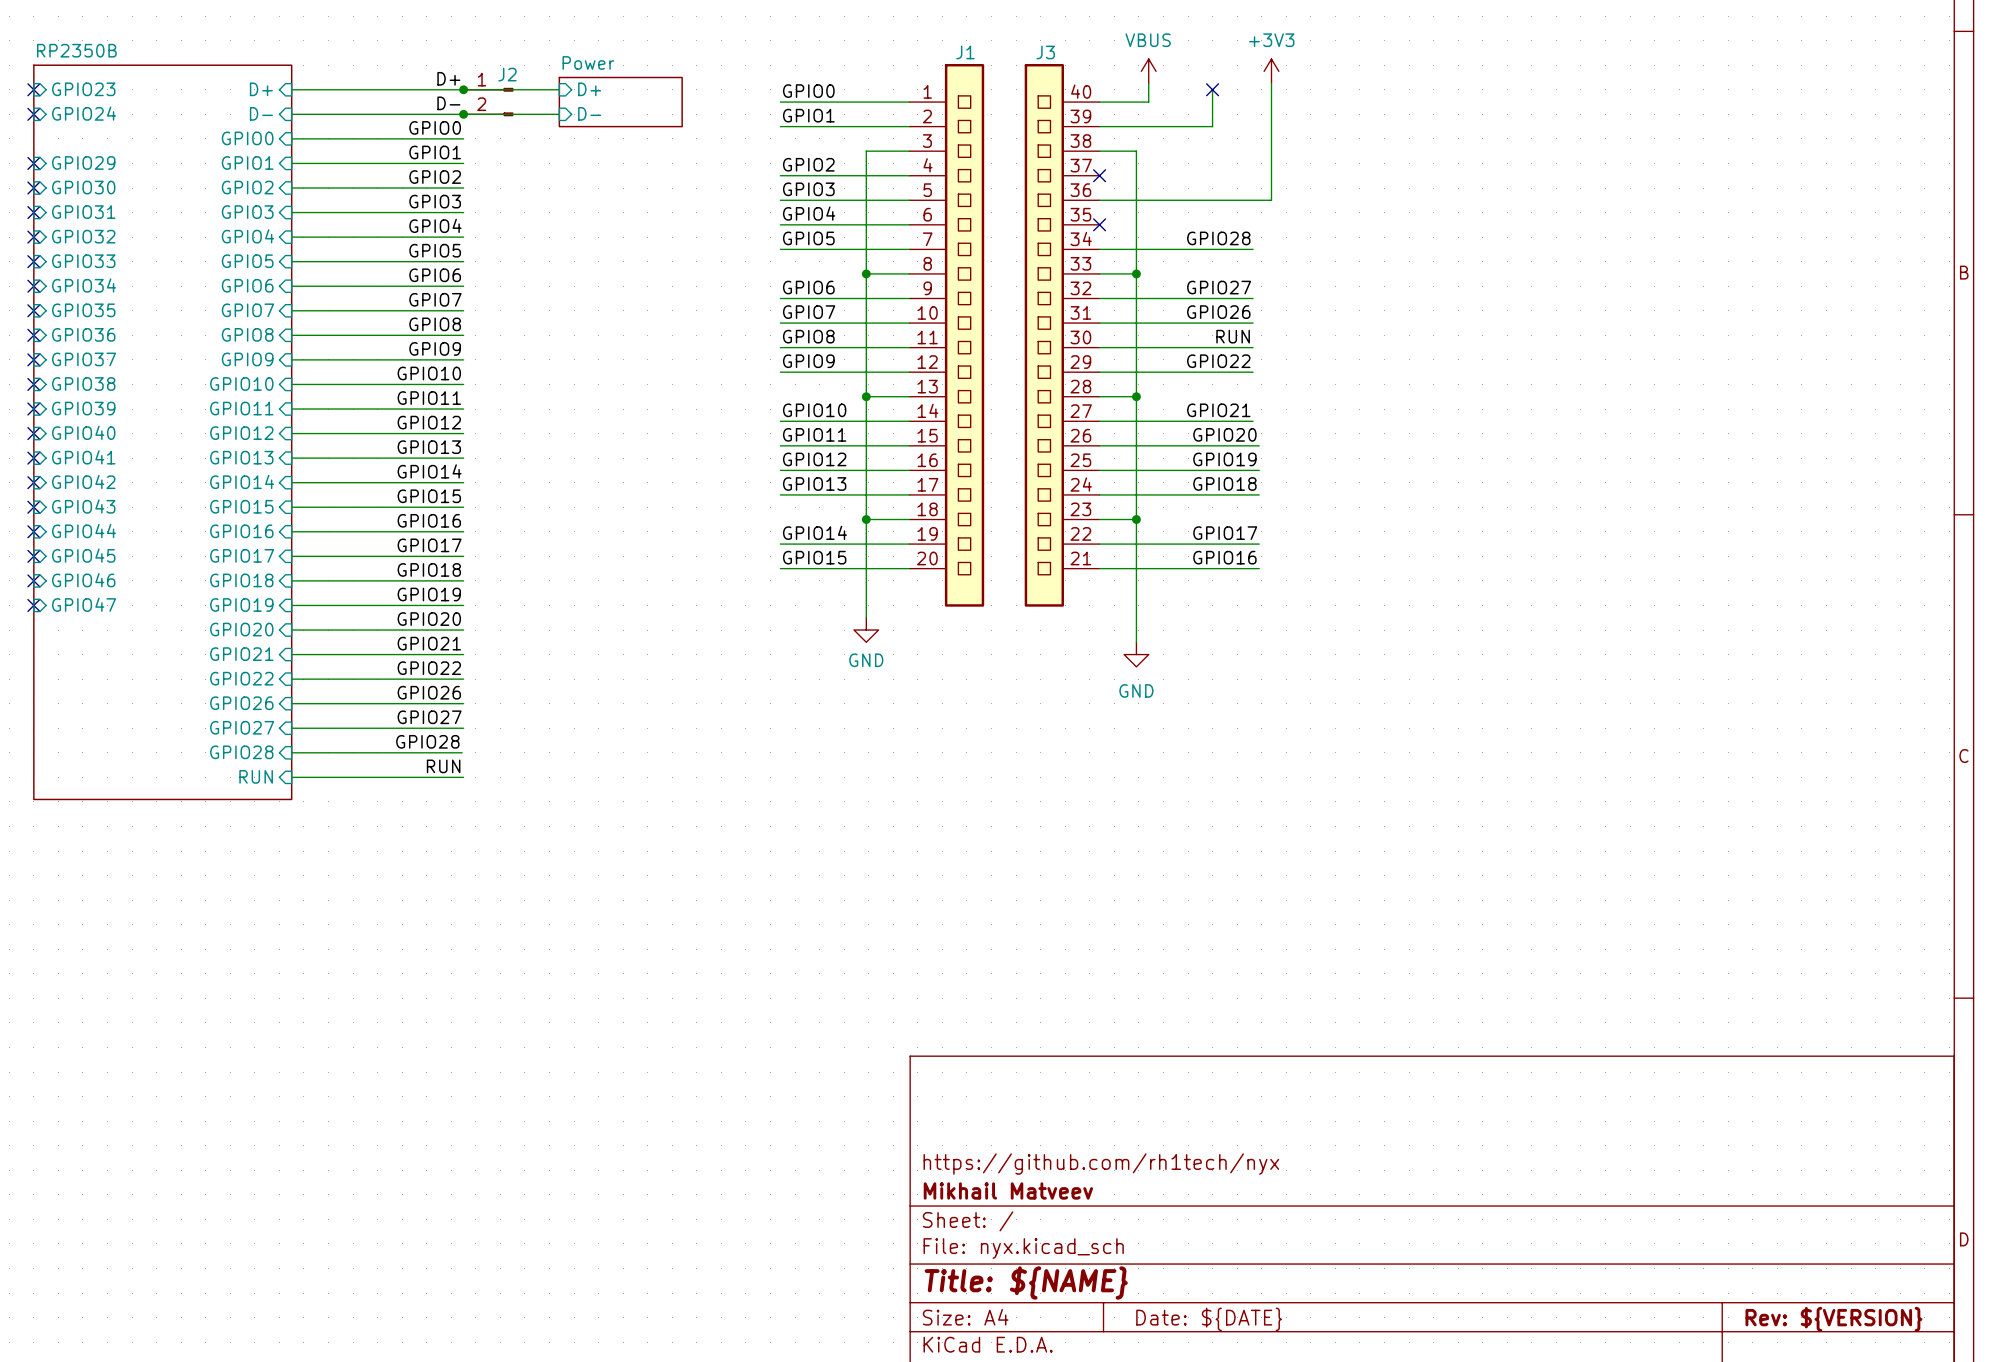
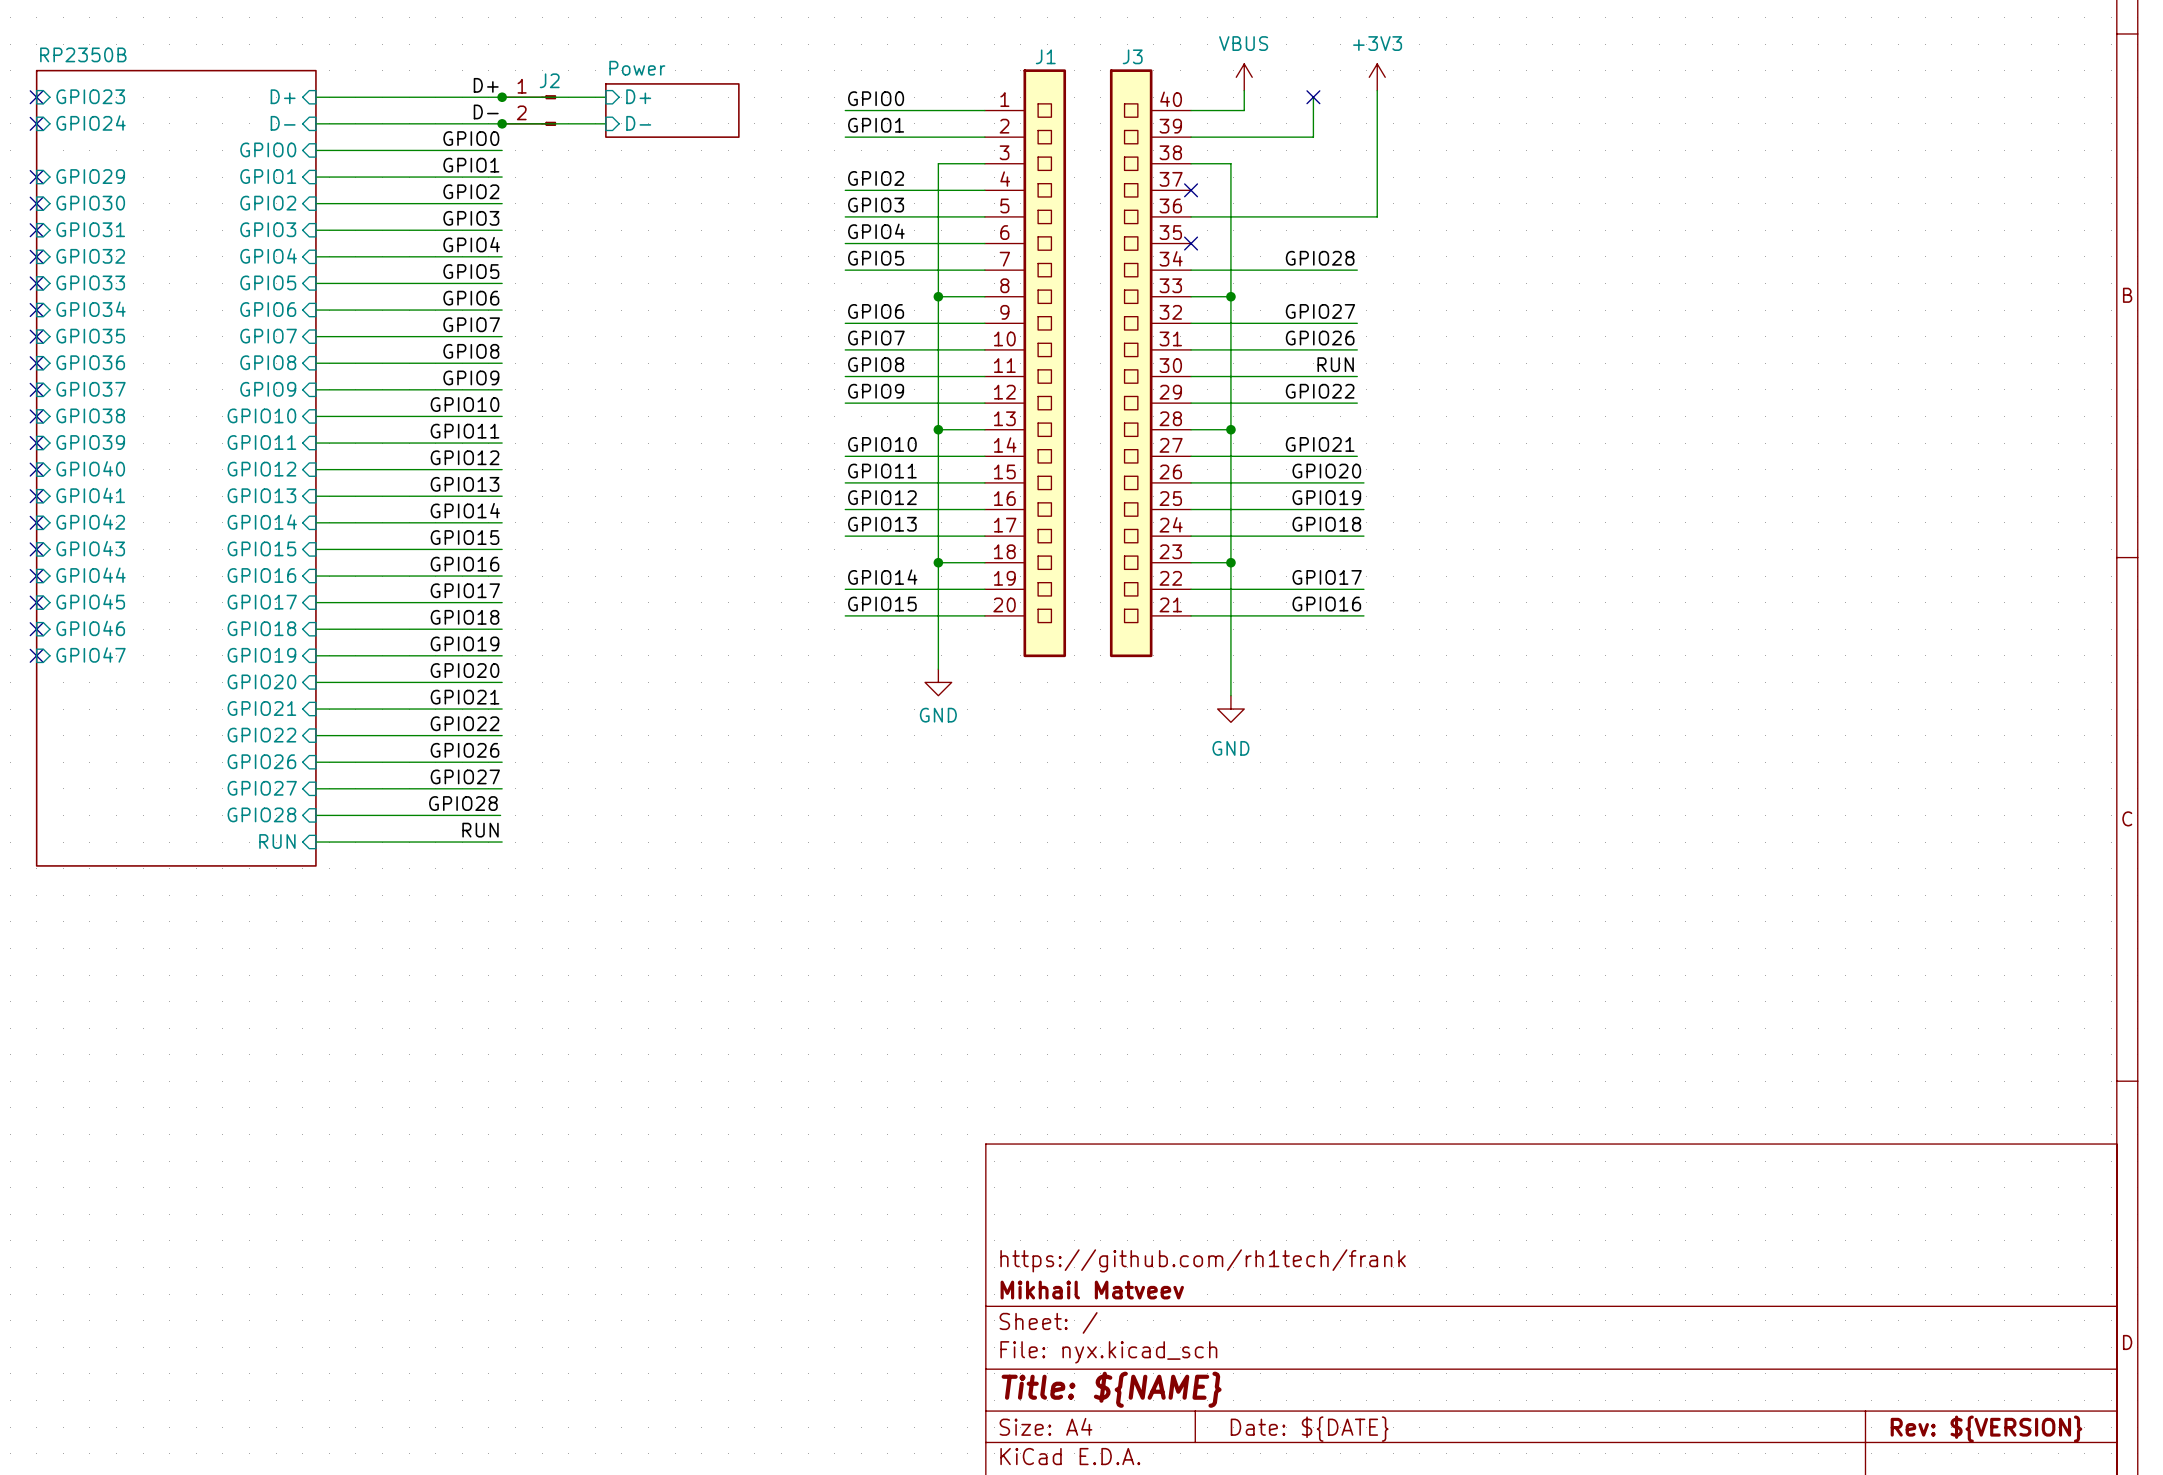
title block: https://github.com/rh1tech/nyx (1101, 1164) -> https://github.com/rh1tech/frank (1203, 1260)

